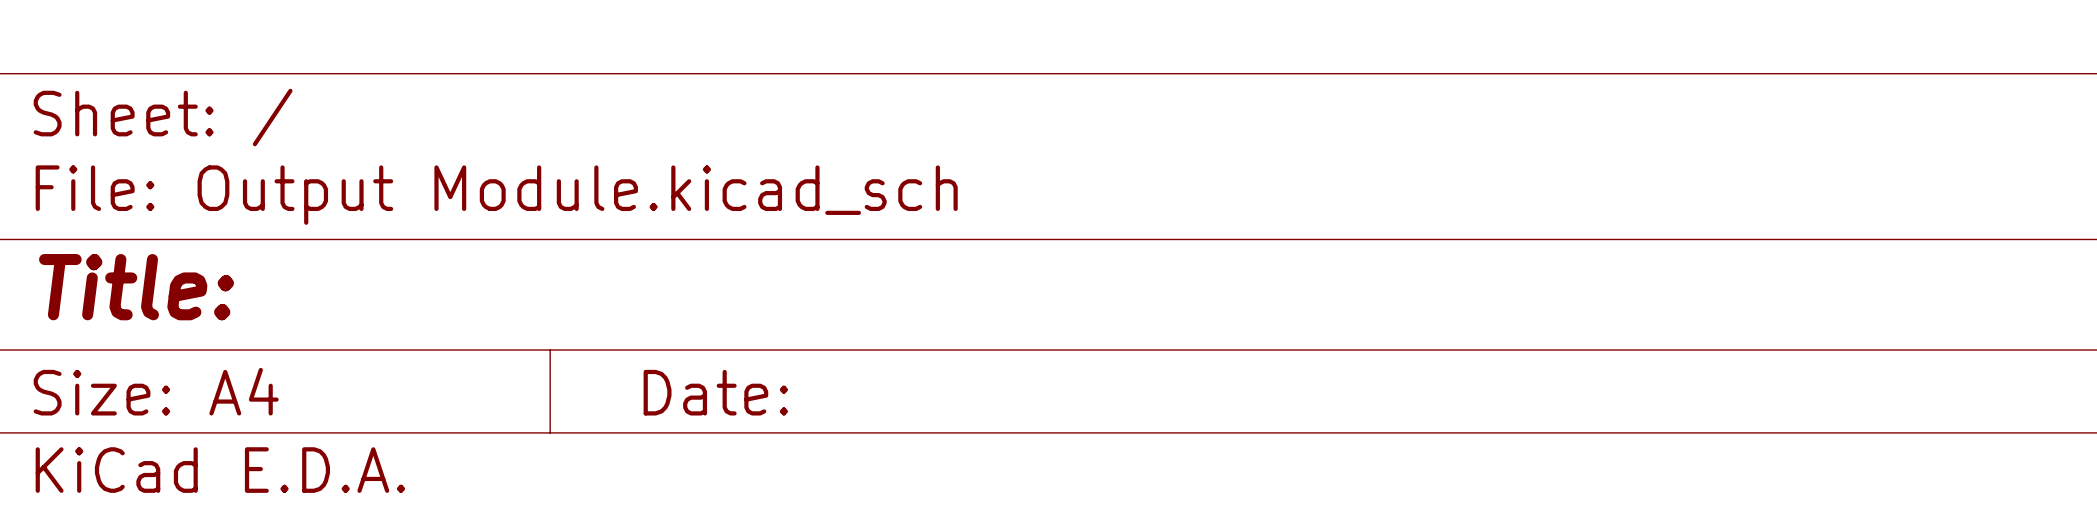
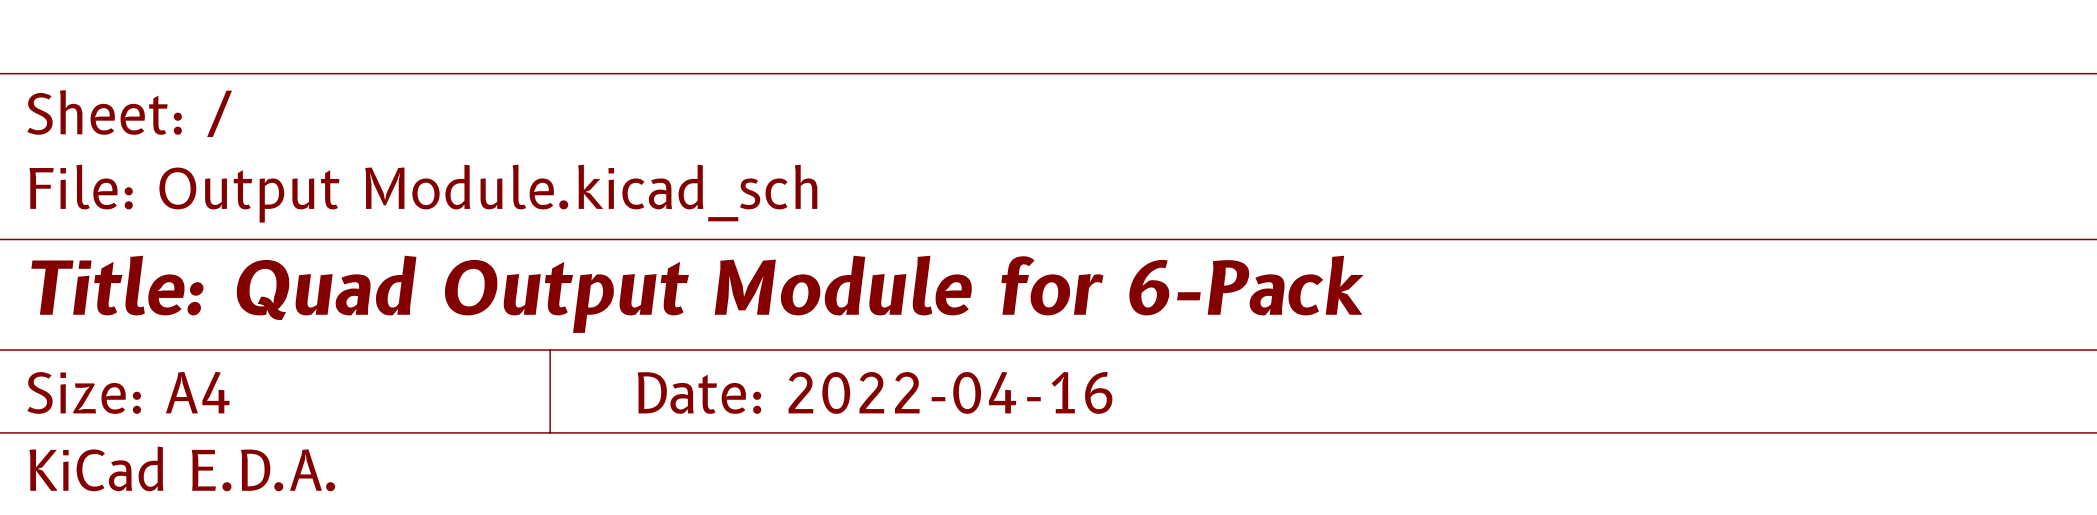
title block: Title: (136, 287) -> Title: Quad Output Module for 6-Pack (697, 294)
title block: Date: (715, 392) -> Date: 2022-04-16 (875, 392)

